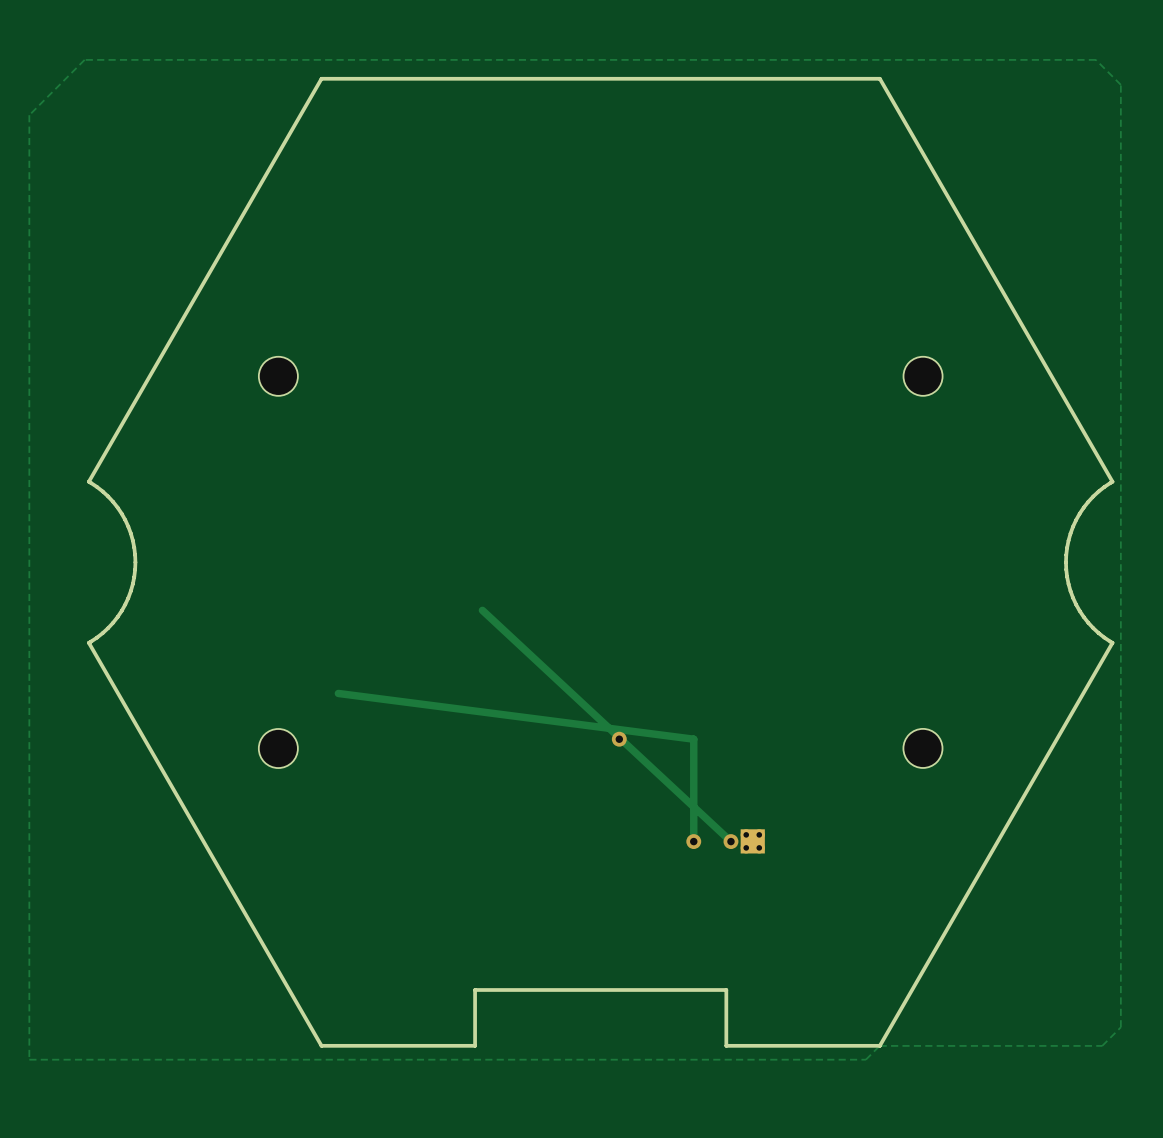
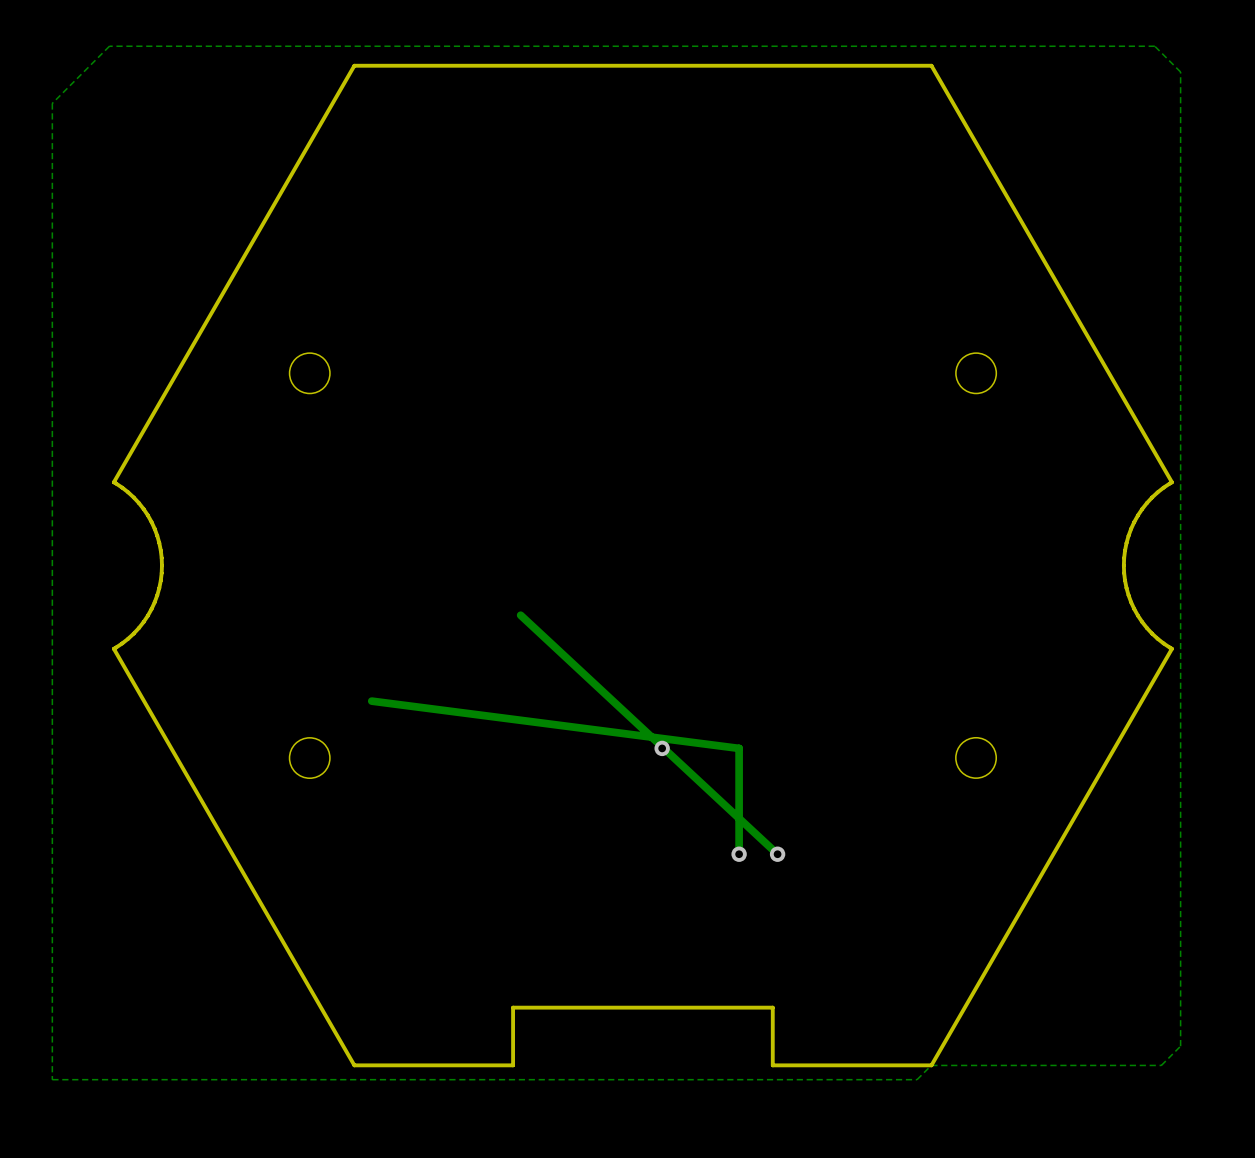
part: (752, 841) -> none

